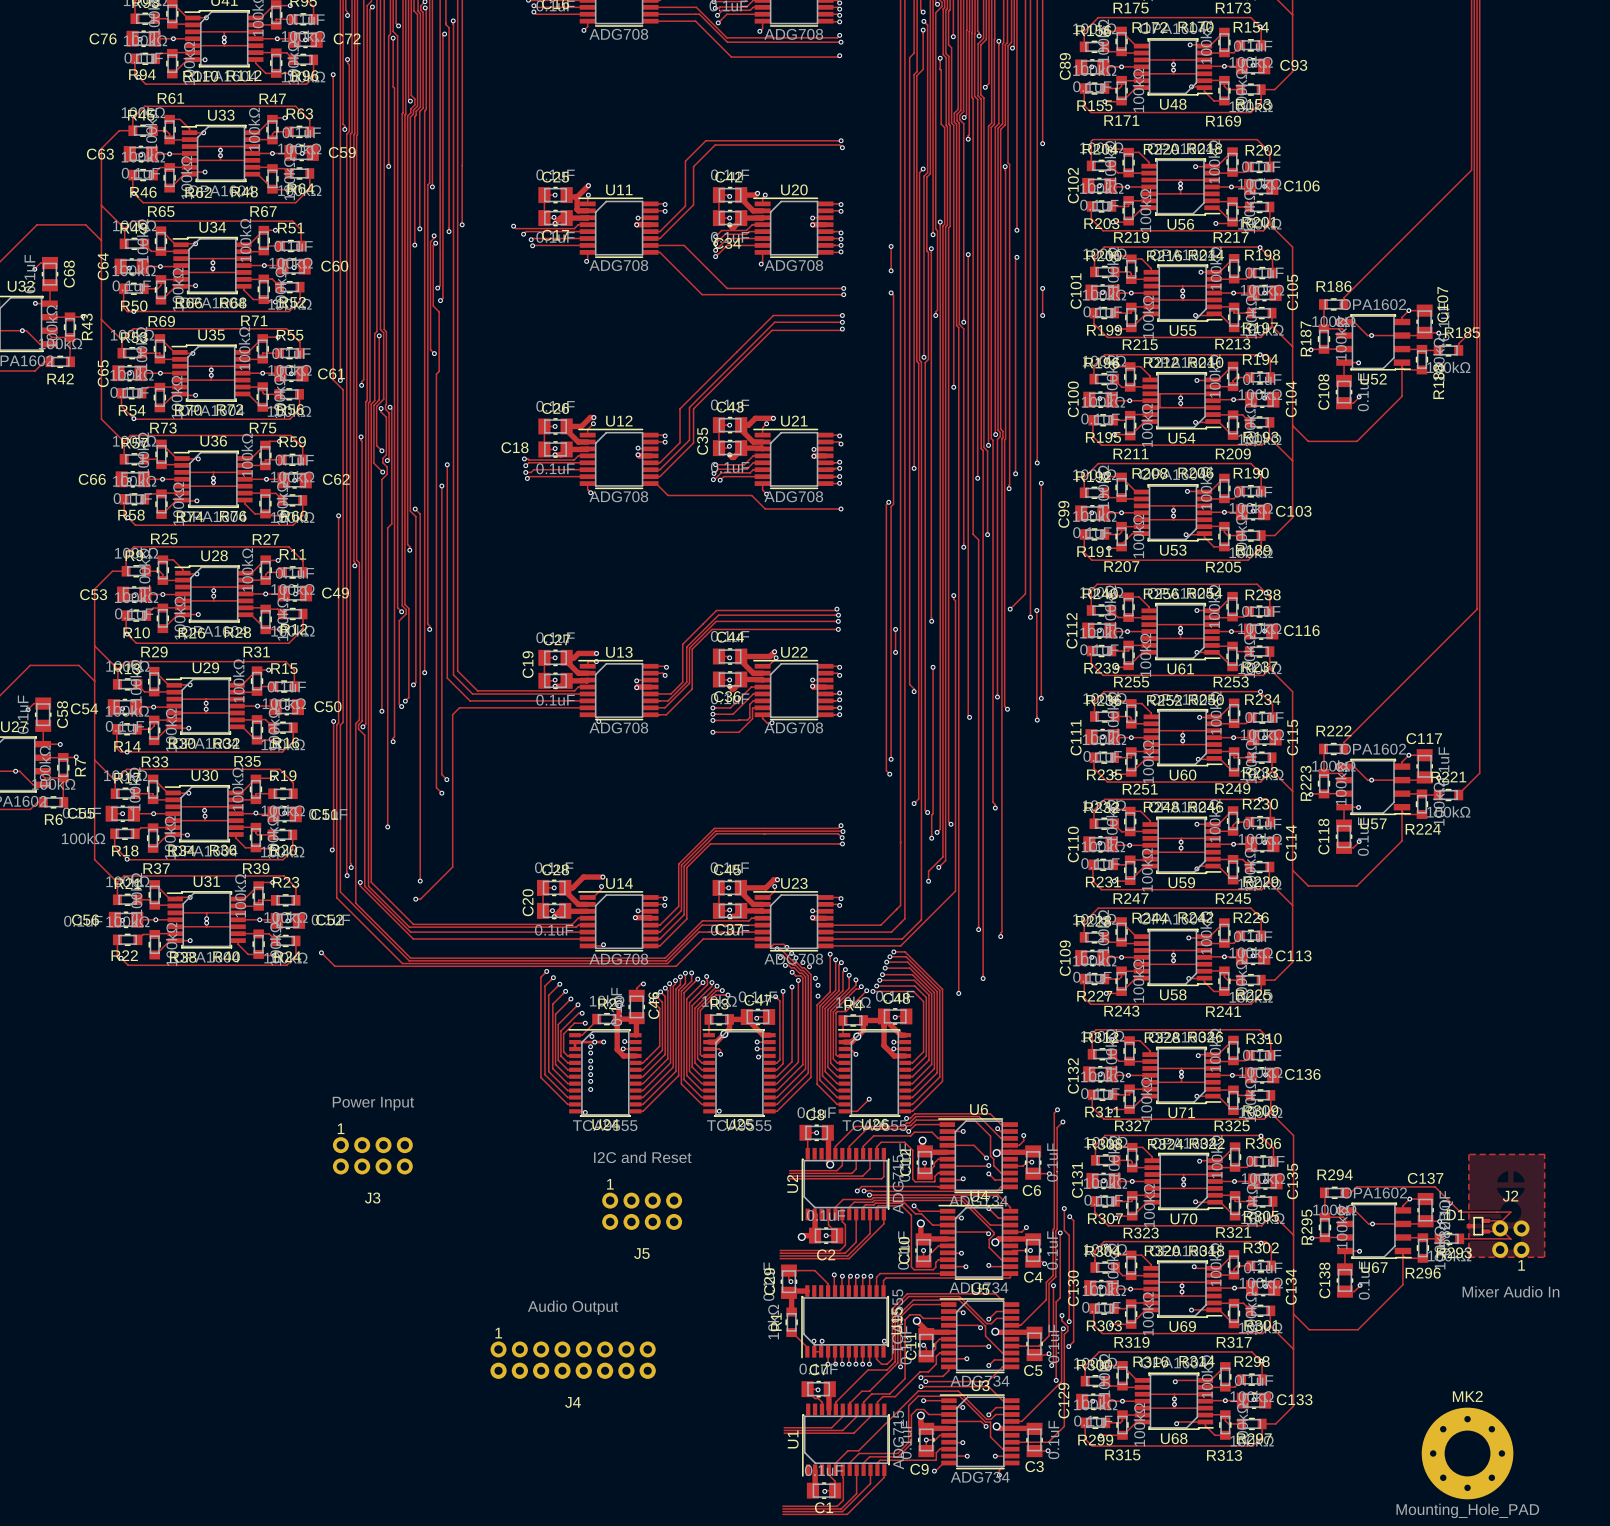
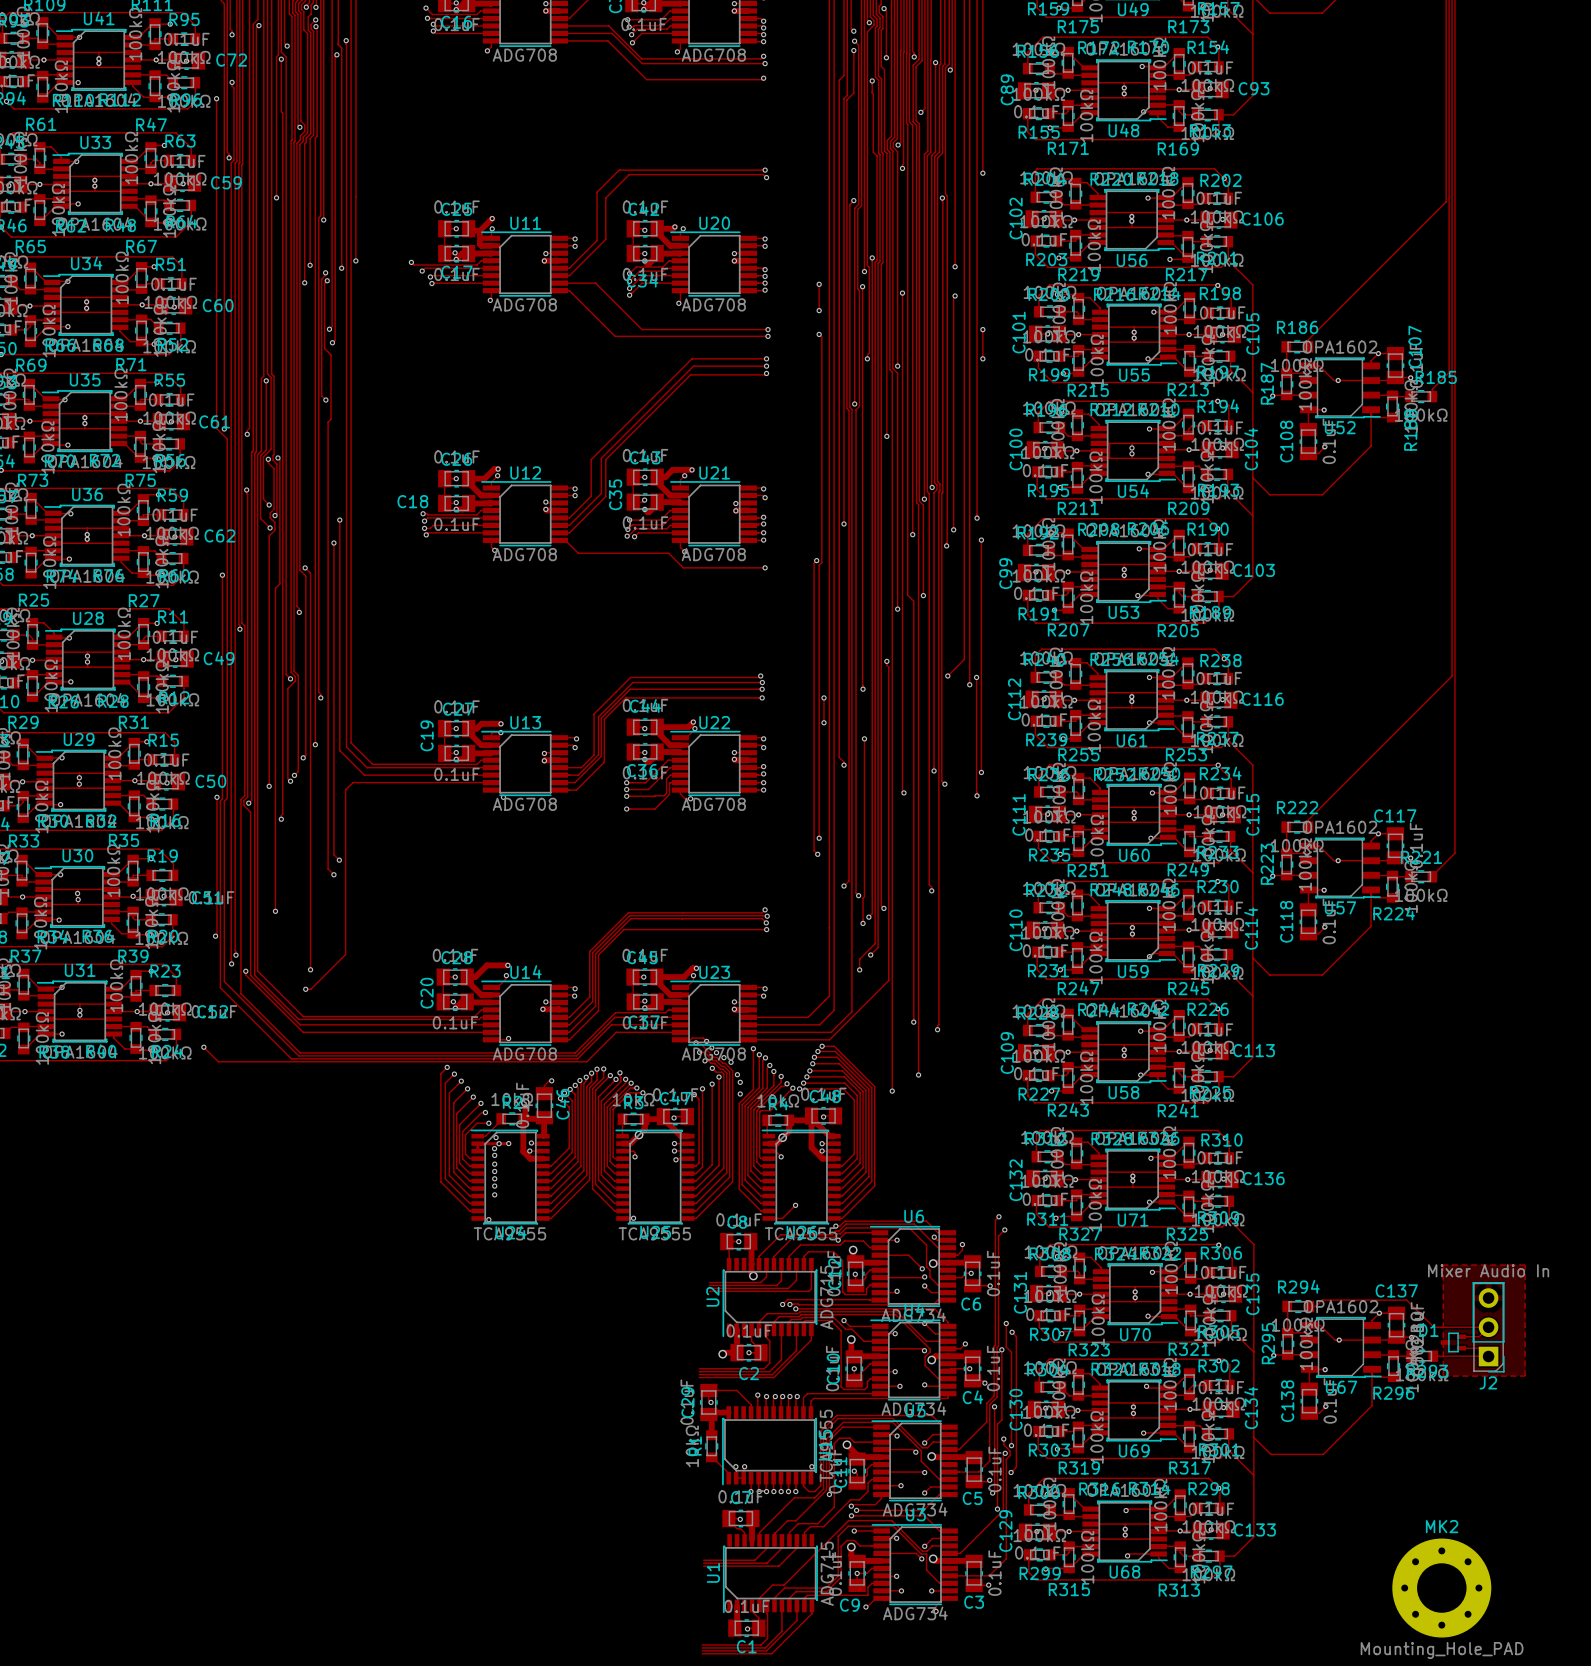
J3: Power Input (372, 1155) -> none
J2 name position: J2 (1510, 1196) -> J2 (1488, 1382)
J5: I2C and Reset (642, 1211) -> none
J2 footprint: [1492, 1220, 1530, 1258] -> [1472, 1282, 1505, 1373]
J2 value position: Mixer Audio In (1510, 1291) -> Mixer Audio In (1488, 1270)
J4: Audio Output (573, 1360) -> none

